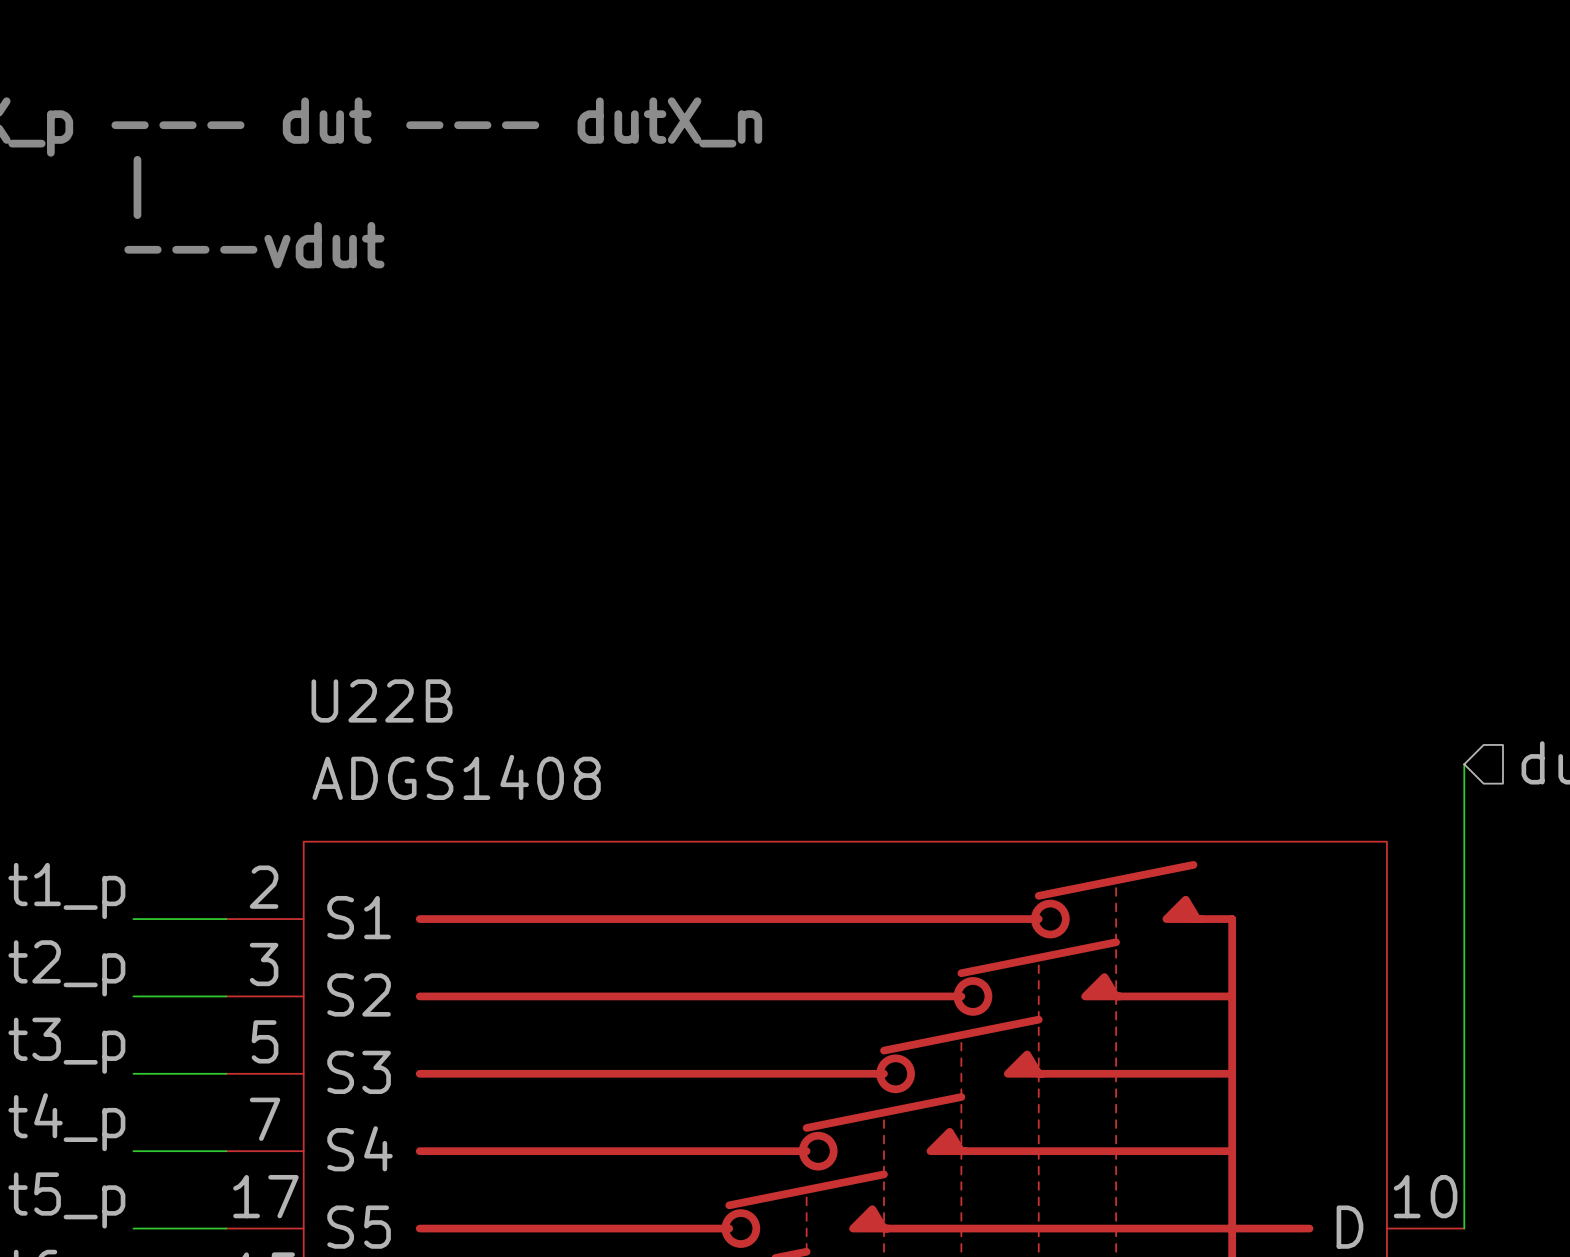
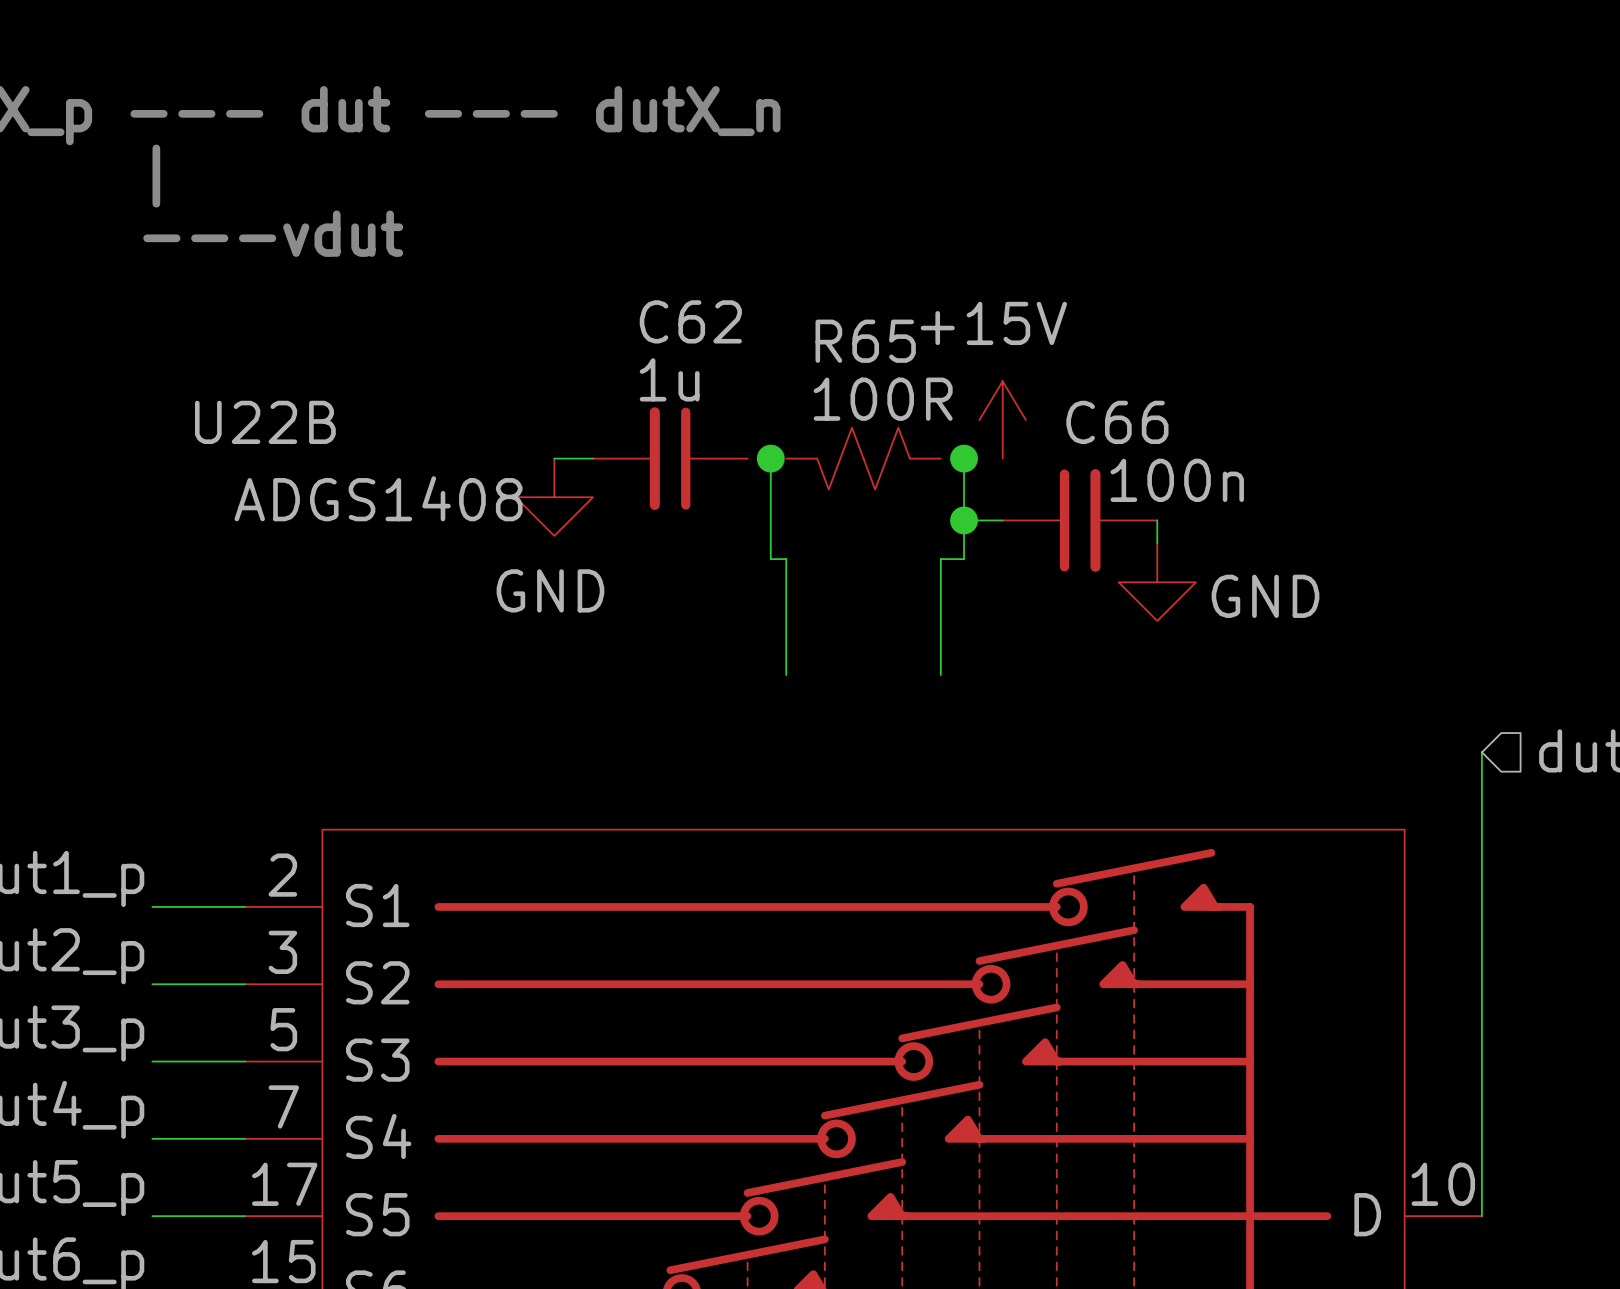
power symbol: none -> +15V (1002, 419)
wire: none -> (554, 458) (592, 458)
C62: none -> 1u (670, 458)
wire: none -> (770, 458) (770, 559) (786, 559) (786, 675)
junction: none -> (770, 458)
R65: none -> 100R (863, 458)
wire: none -> (964, 458) (964, 559) (940, 559) (940, 675)
junction: none -> (964, 458)
power symbol: none -> GND (554, 497)
wire: none -> (964, 520) (1002, 520)
junction: none -> (964, 520)
C66: none -> 100n (1079, 520)
wire: none -> (1157, 520) (1157, 543)
power symbol: none -> GND (1157, 582)
U22B name position: U22B (381, 700) -> U22B (265, 422)
U22B value position: ADGS1408 (456, 777) -> ADGS1408 (378, 498)

